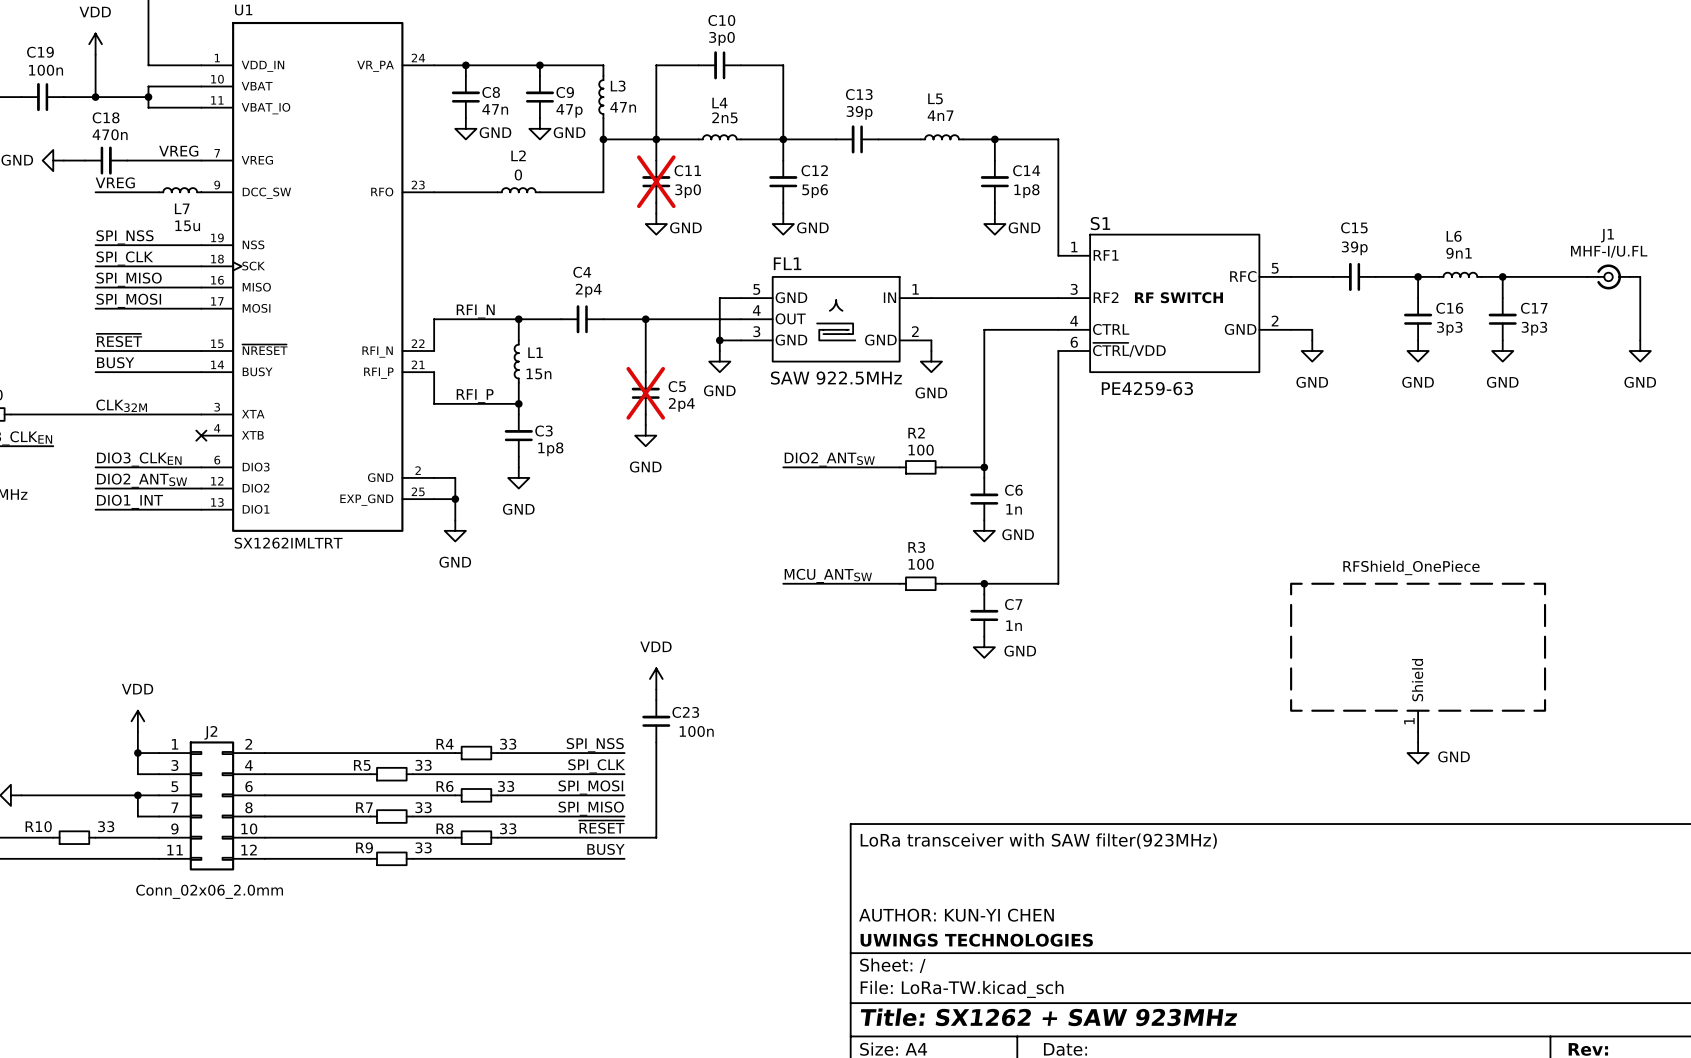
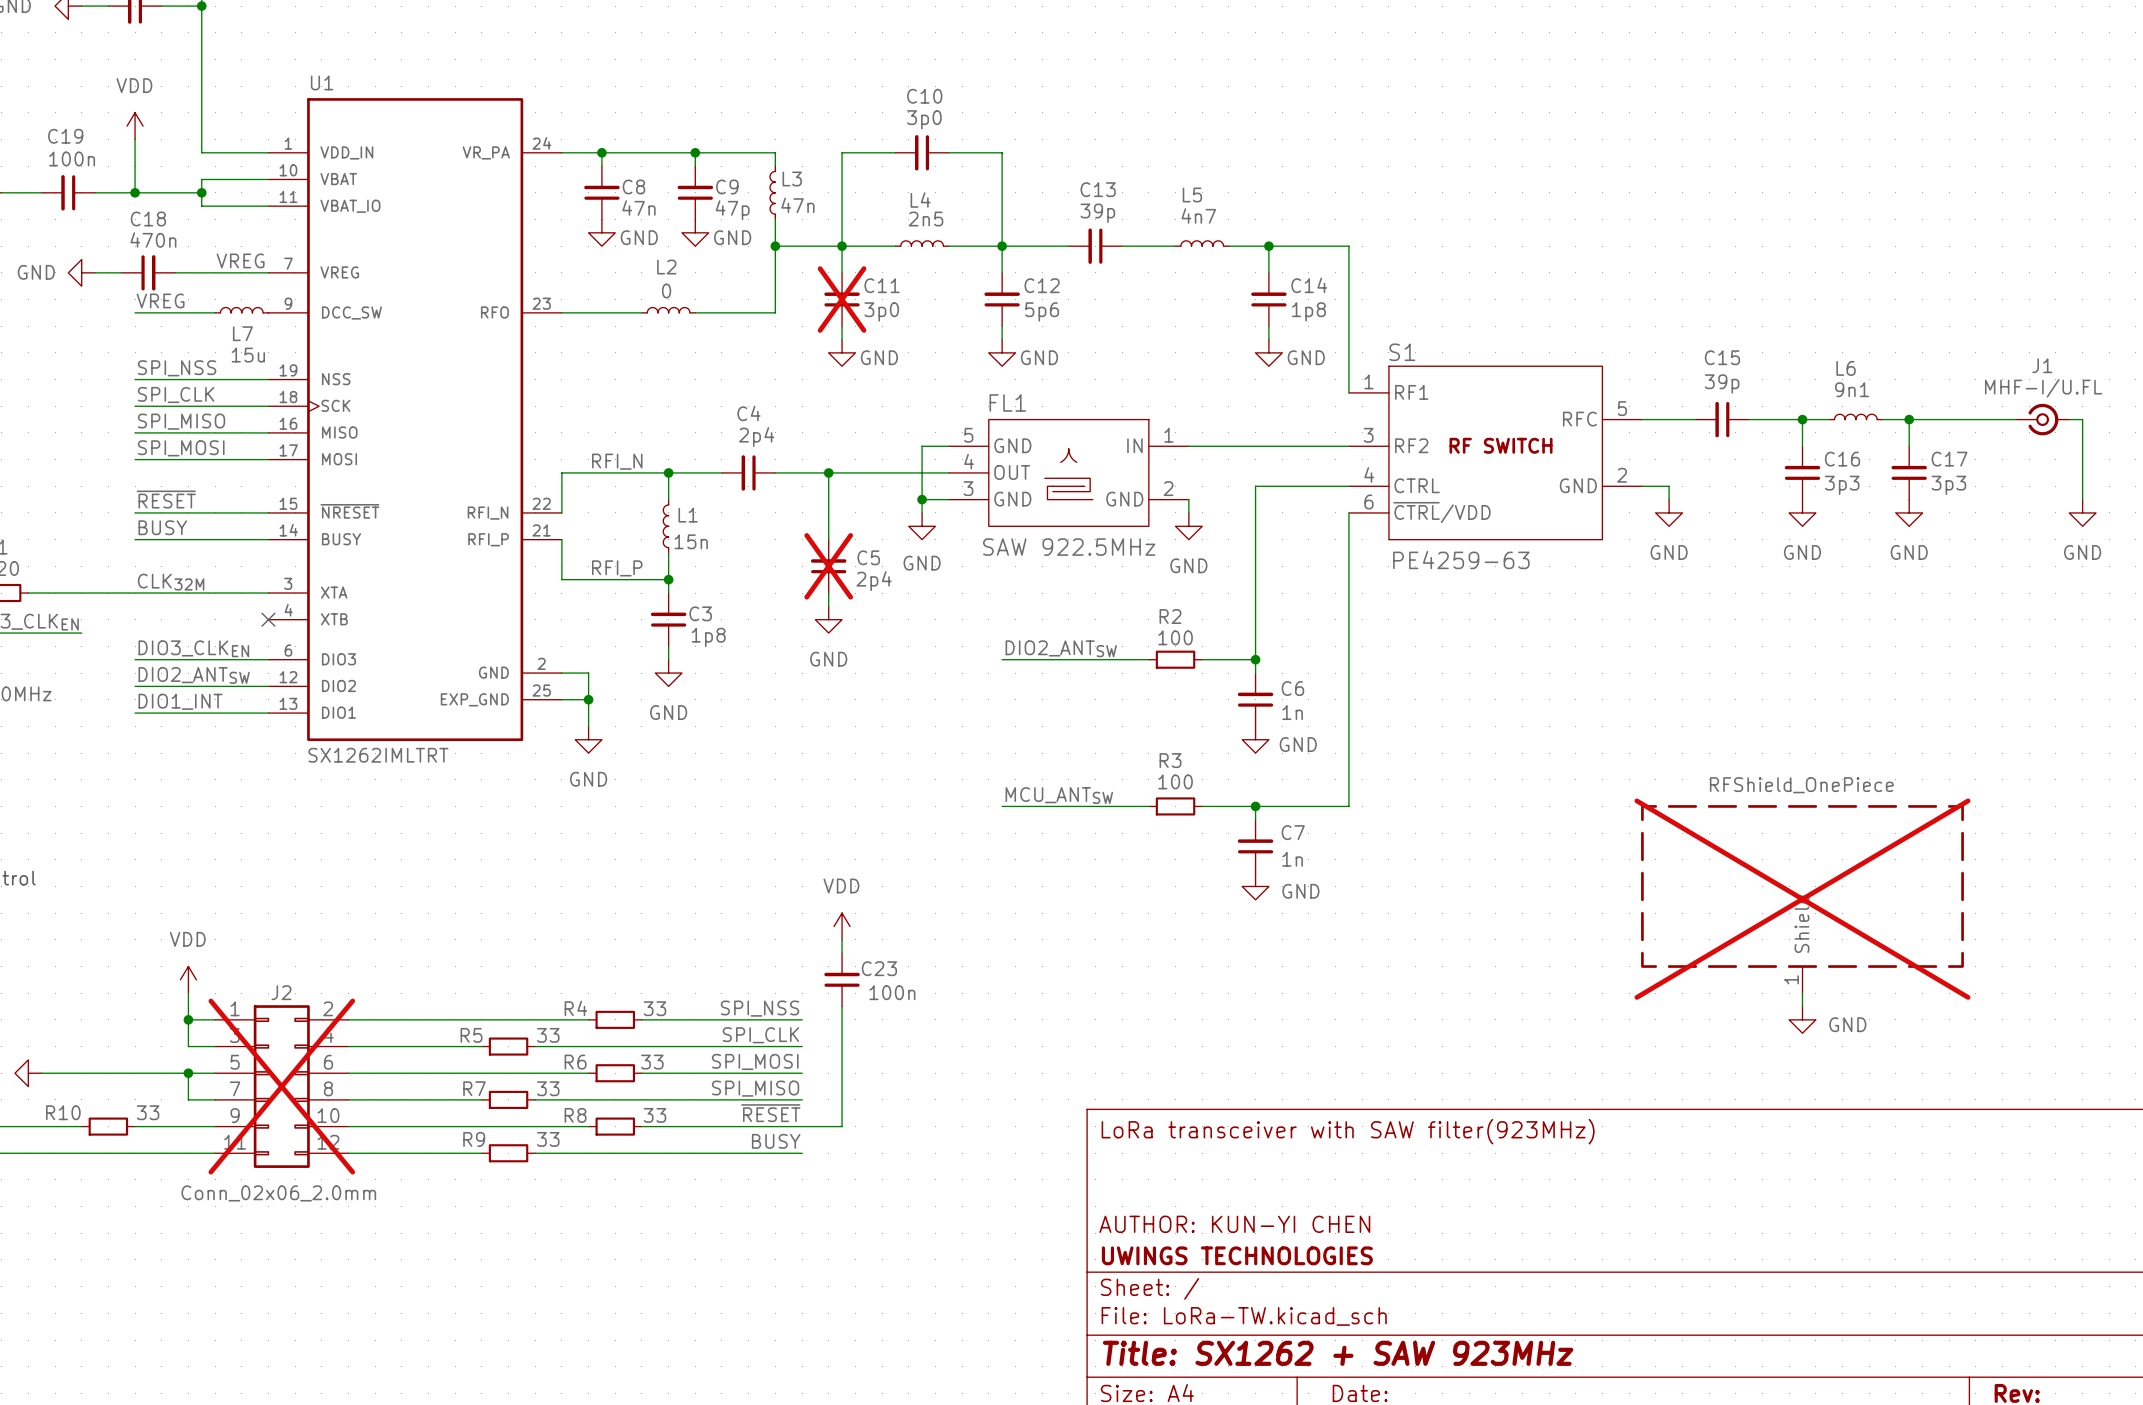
part do-not-place cross: none -> (1802, 899)
J2 do-not-place cross: none -> (281, 1086)

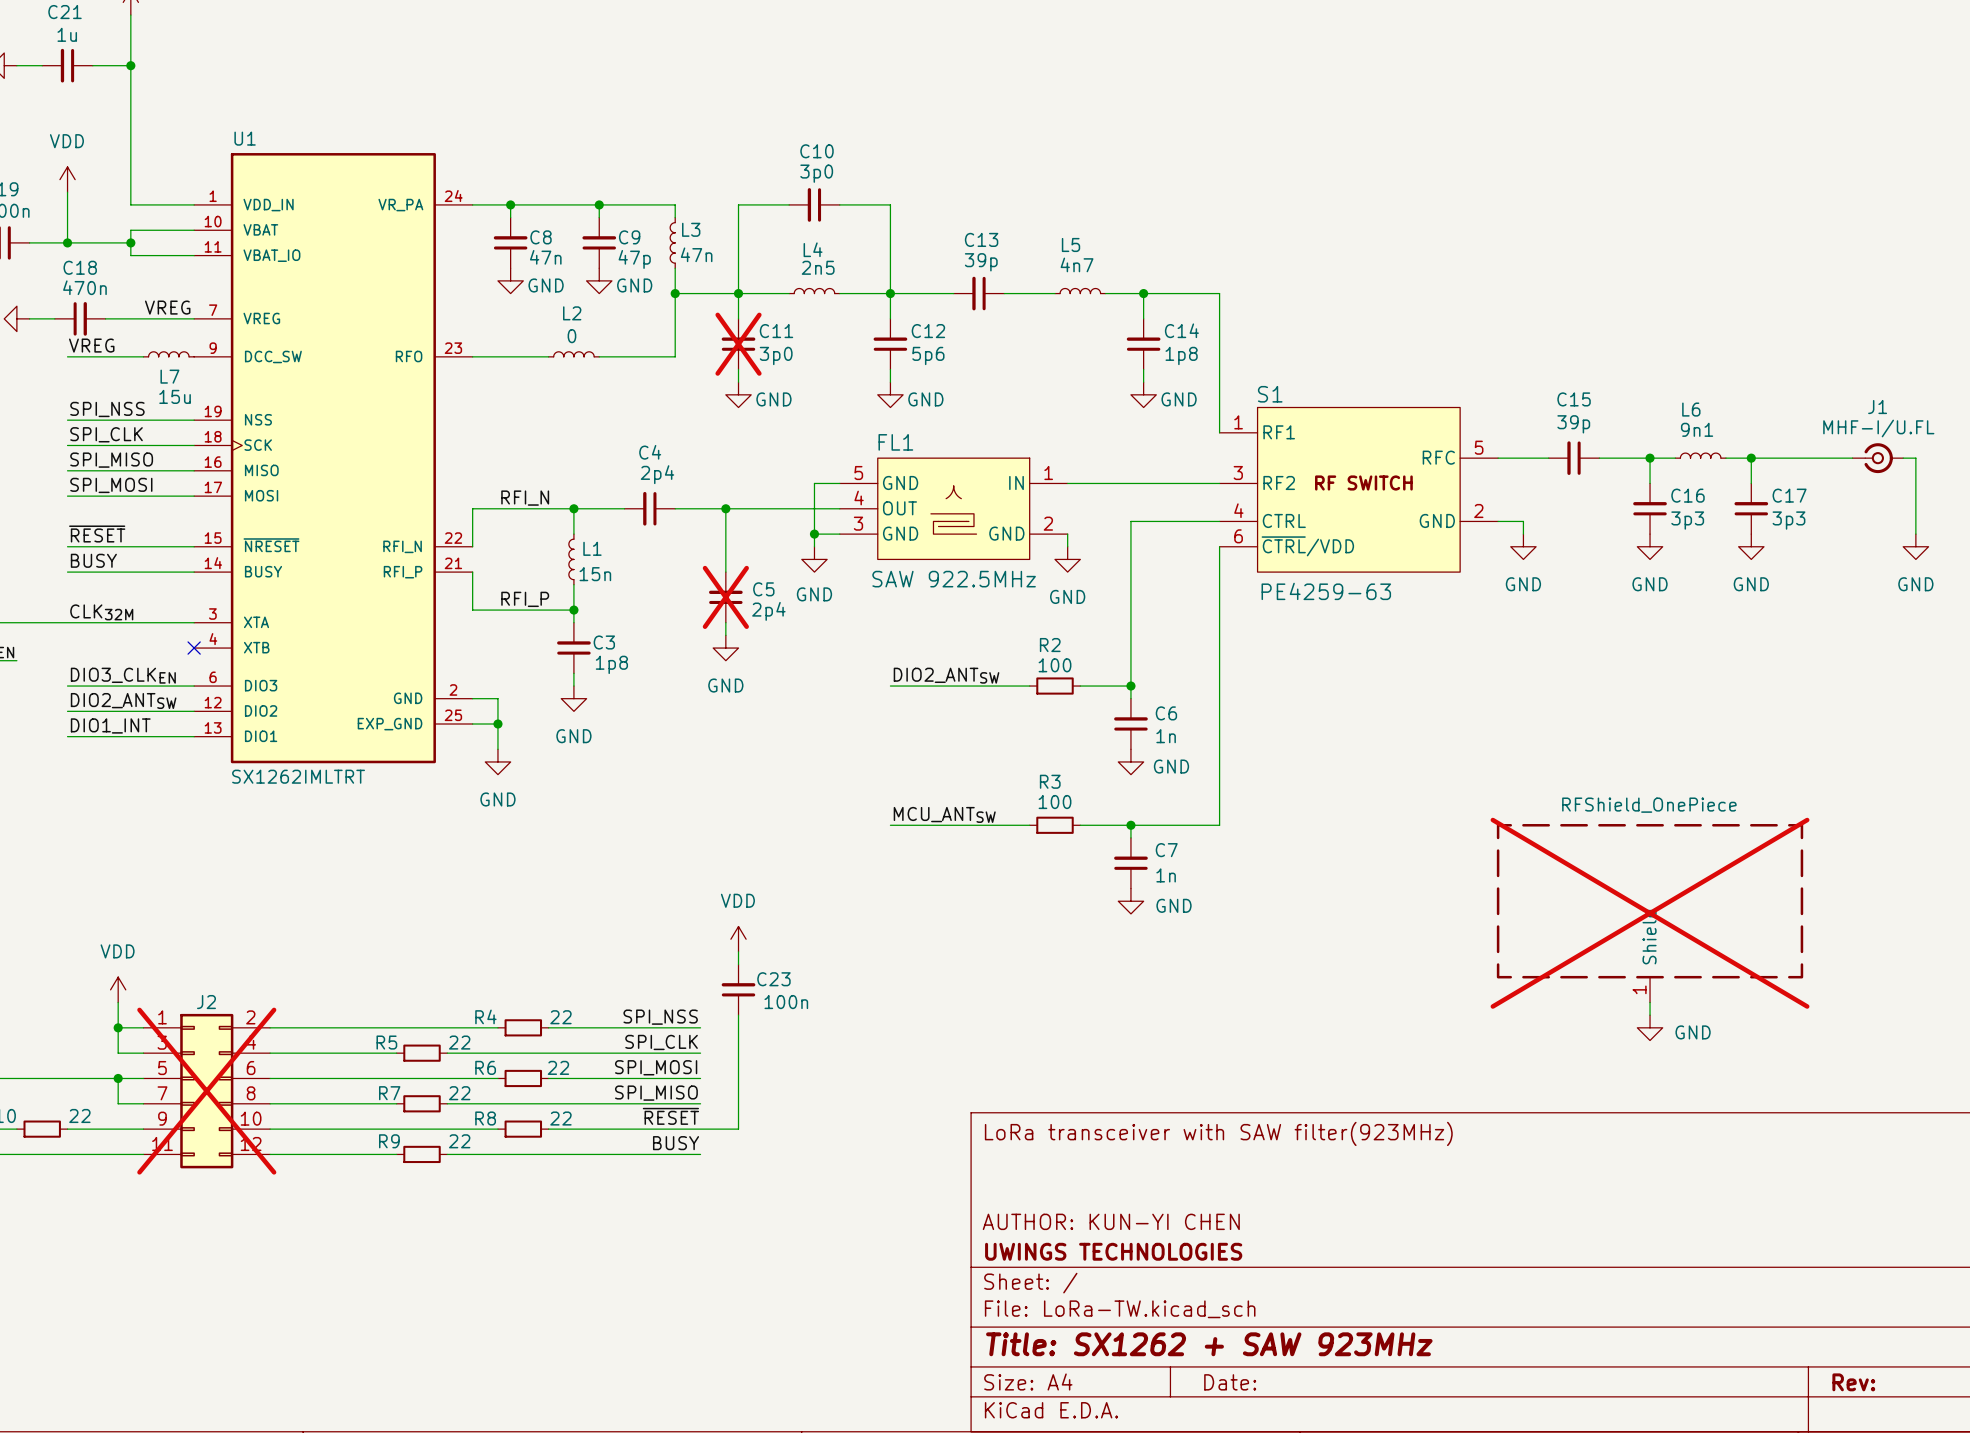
R4 value: 33 (654, 1008) -> 22 (560, 1017)
R5 value: 33 (548, 1035) -> 22 (459, 1042)
R6 value: 33 (652, 1062) -> 22 (558, 1067)
R7 value: 33 (548, 1088) -> 22 (459, 1093)
R10 value: 33 (148, 1112) -> 22 (79, 1115)
R8 value: 33 (654, 1115) -> 22 (560, 1118)
R9 value: 33 (548, 1139) -> 22 (459, 1141)
J2 value: Conn_02x06_2.0mm (278, 1193) -> none

